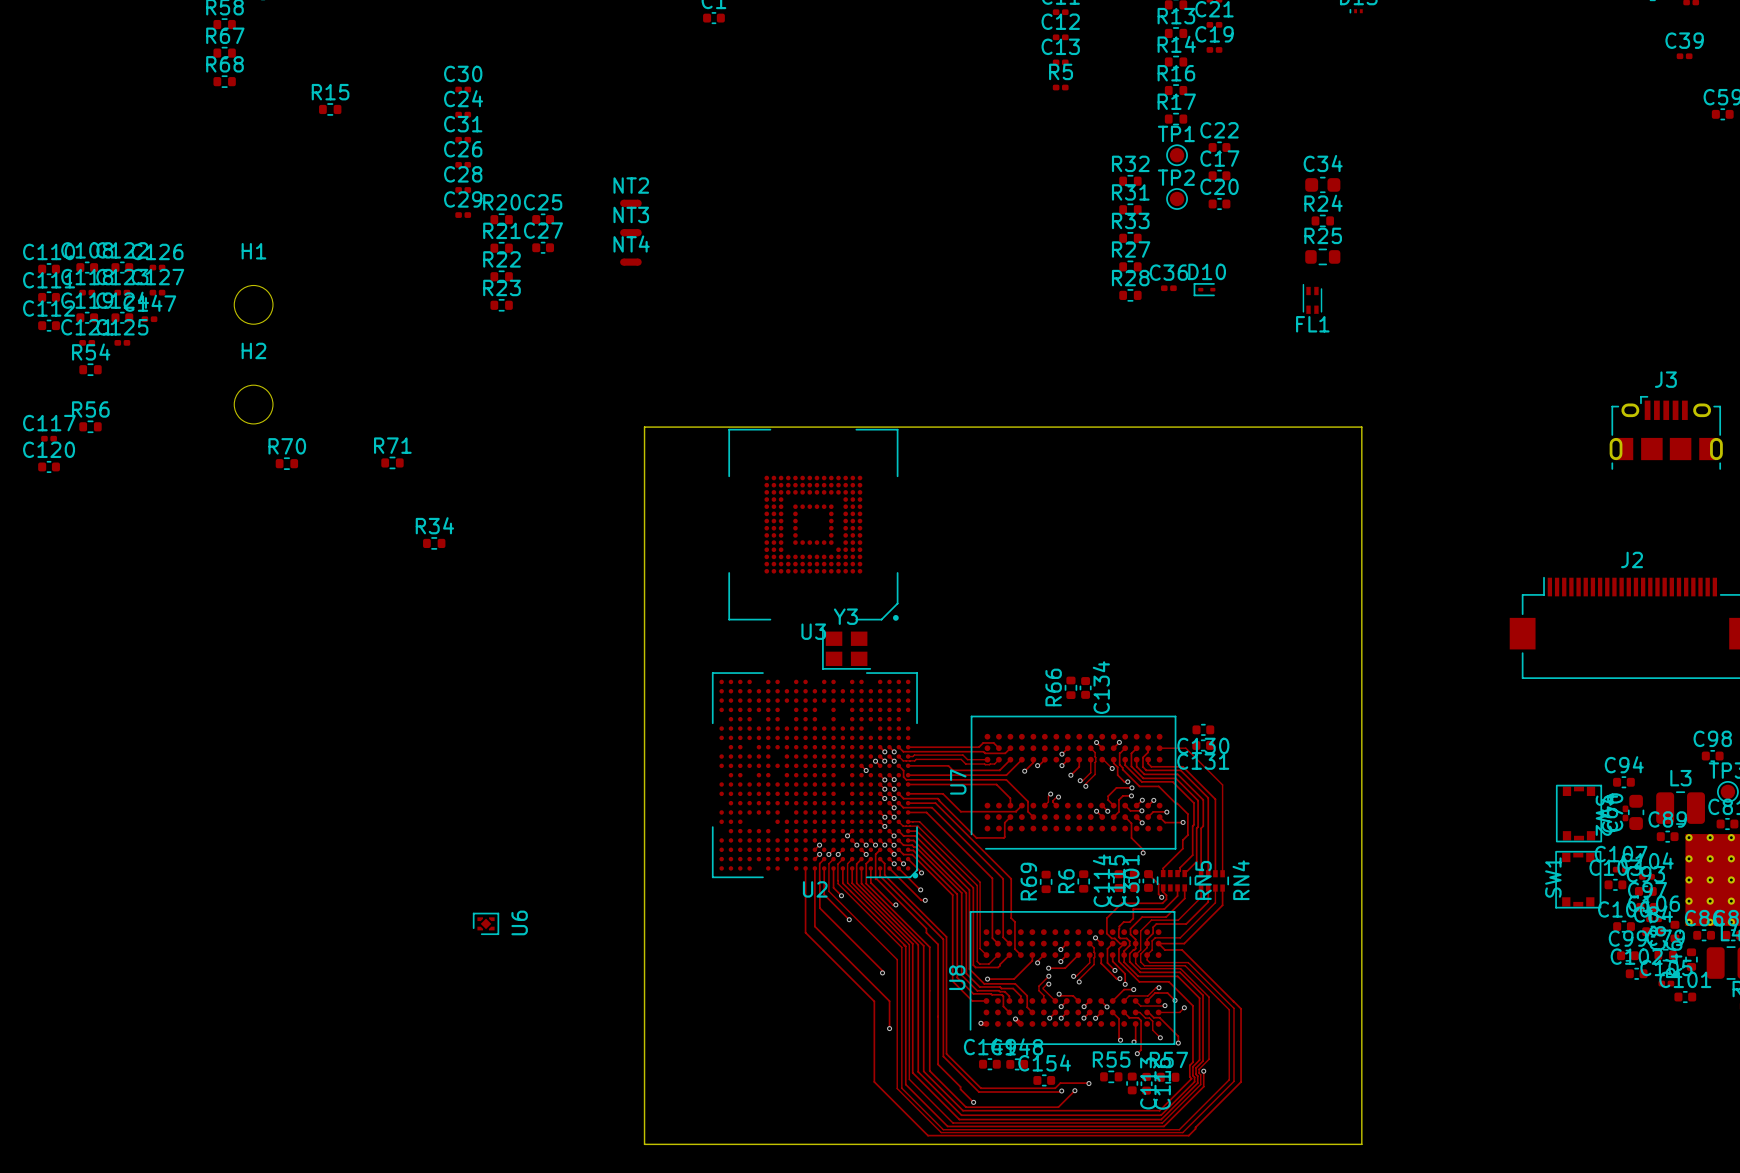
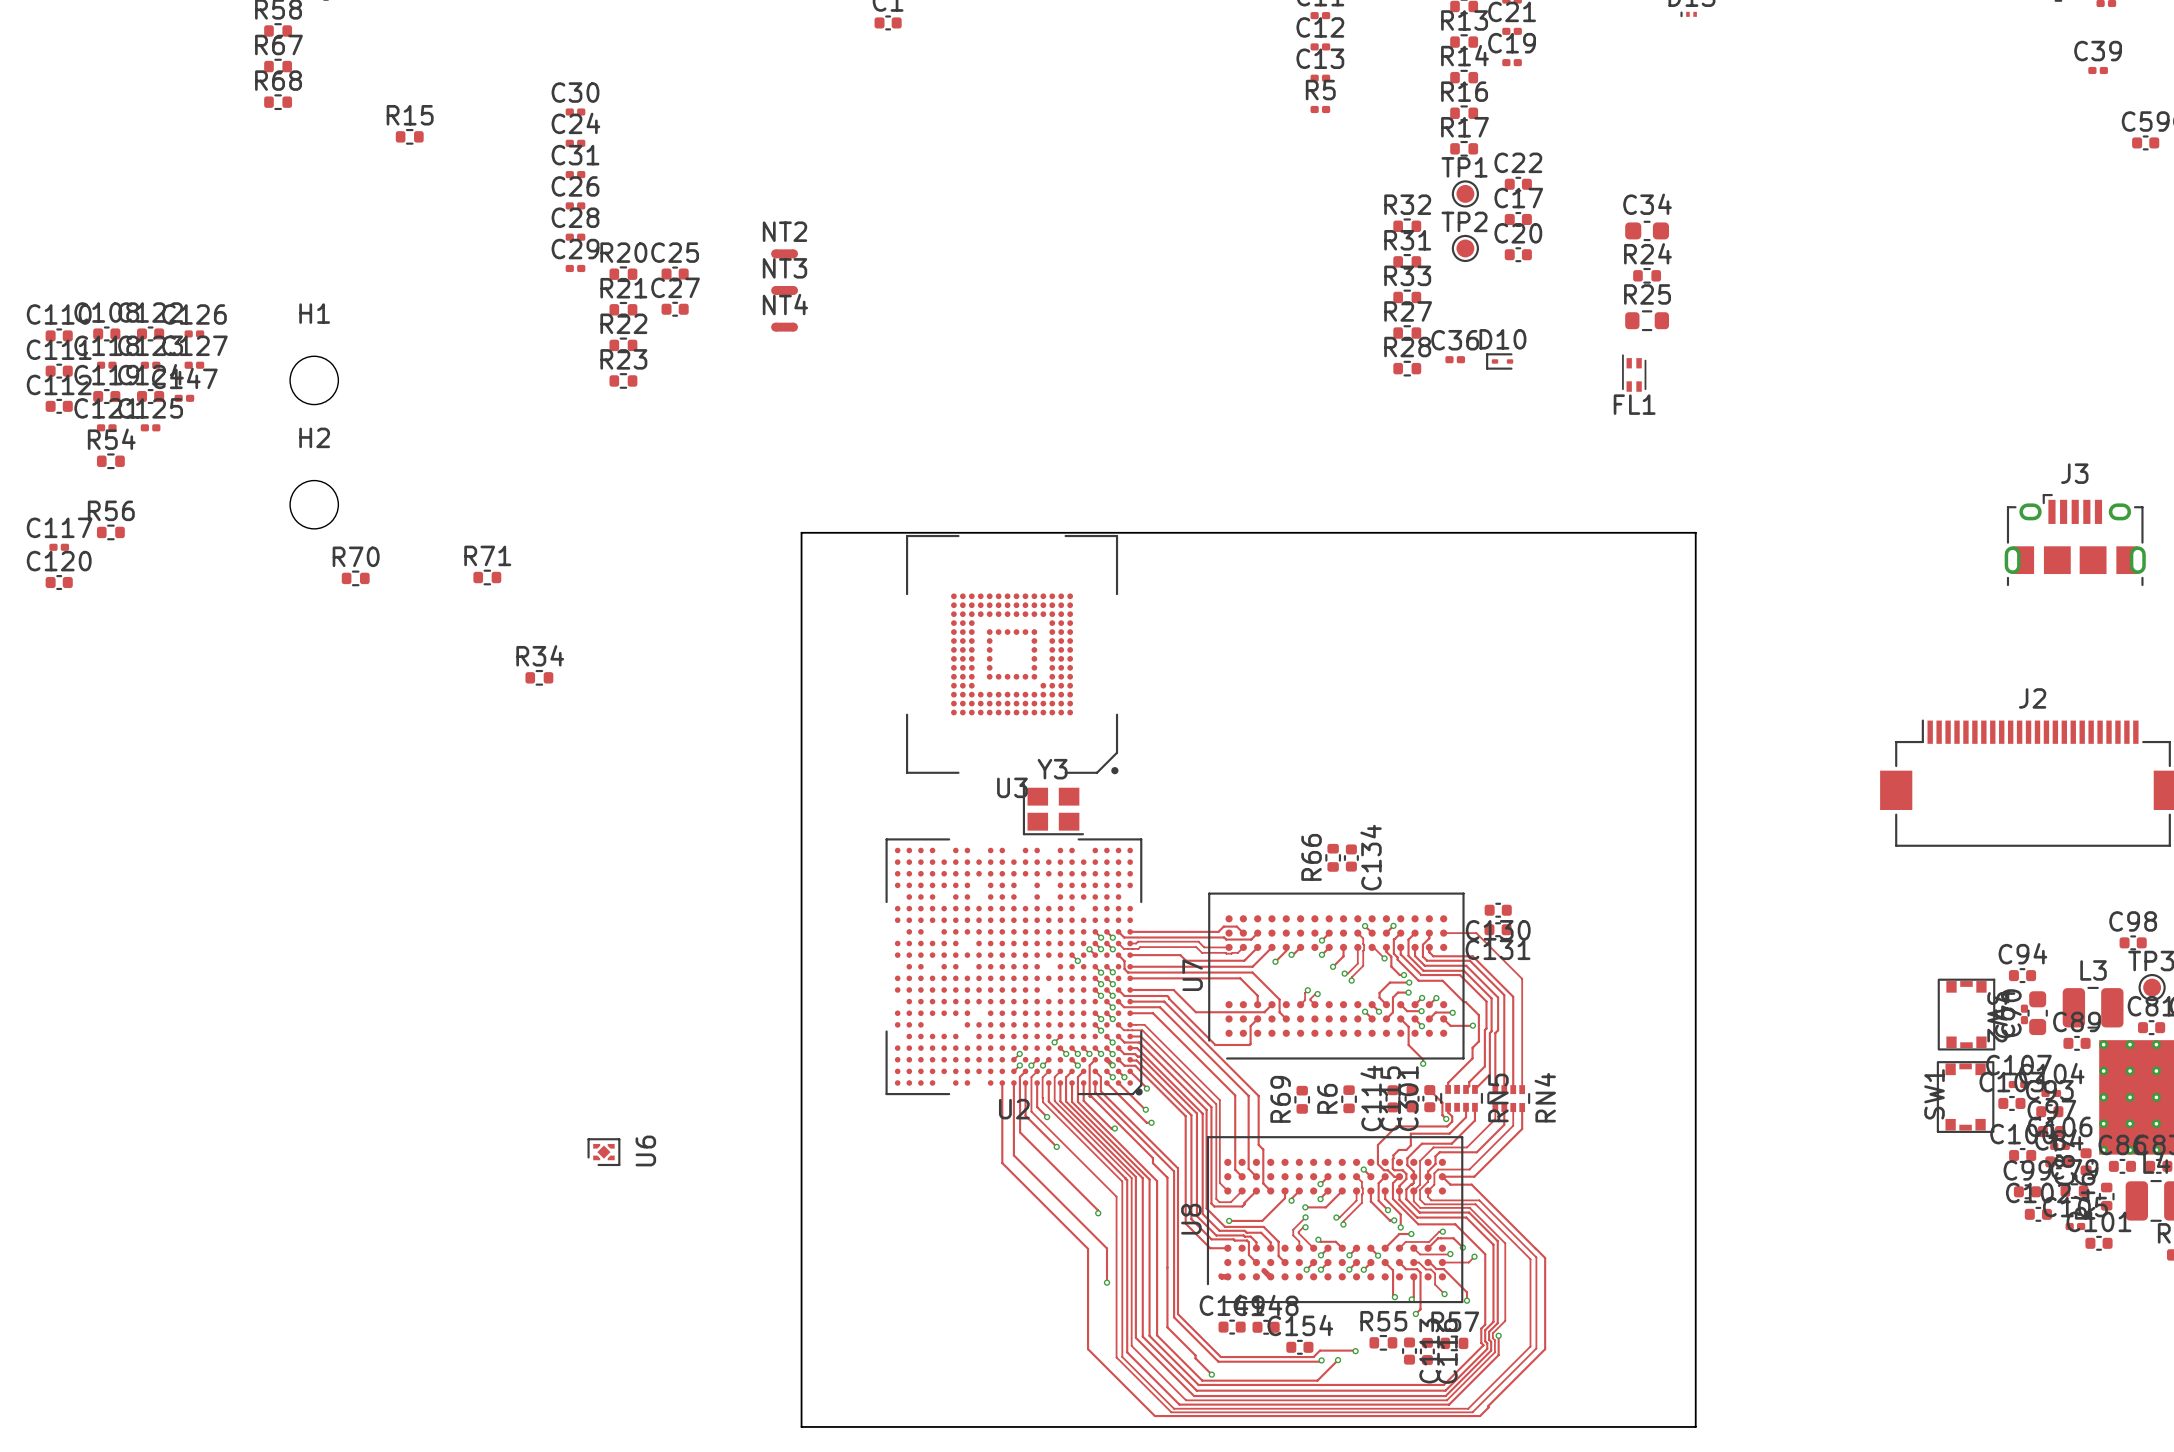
via: (1015, 1019) -> none
via: (980, 1023) -> none

